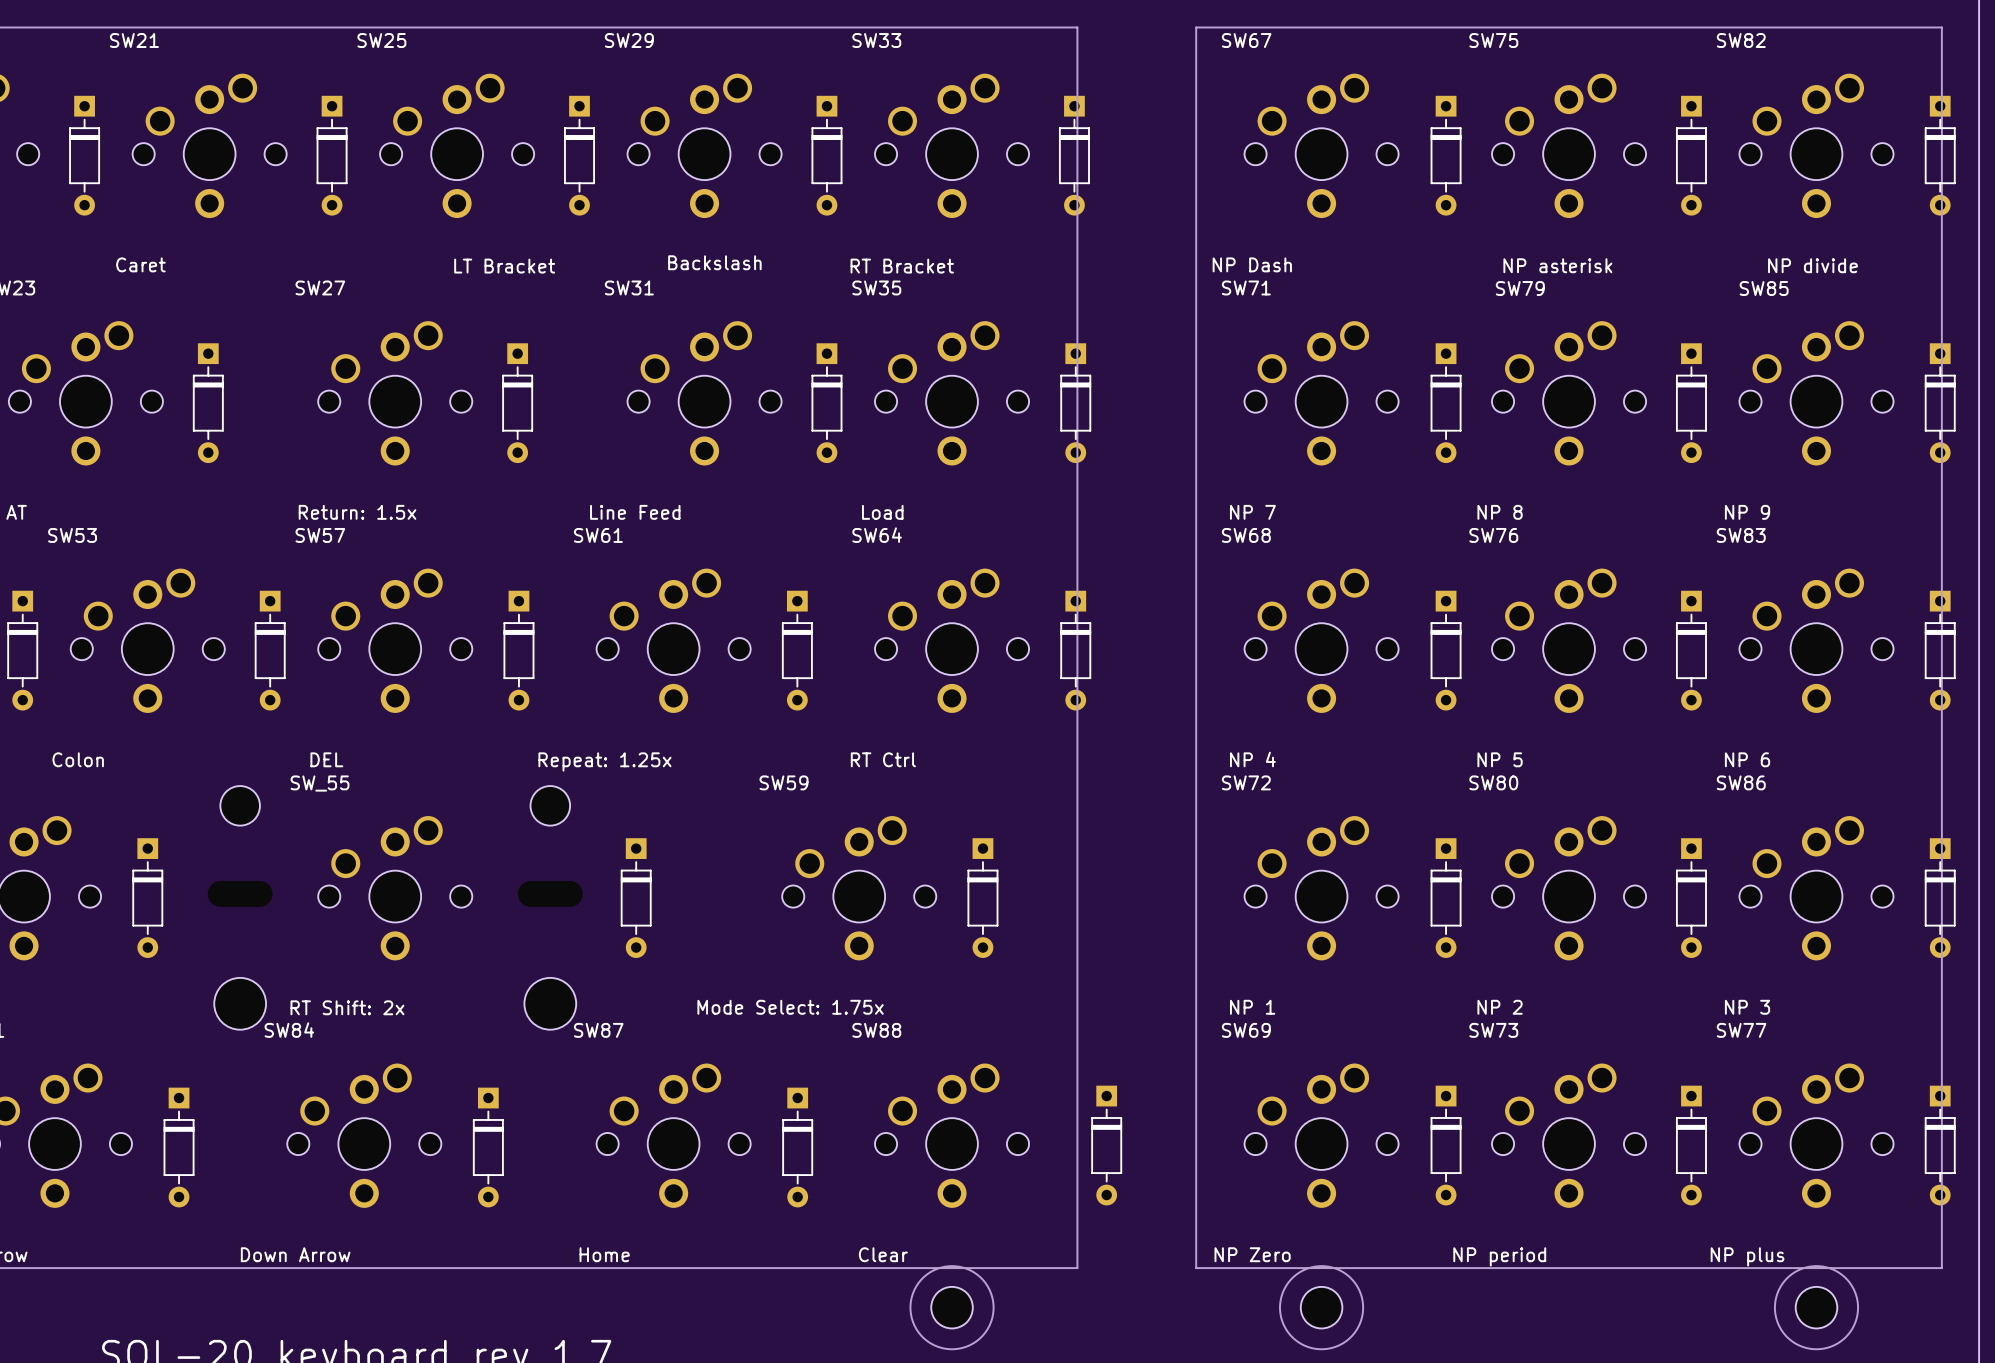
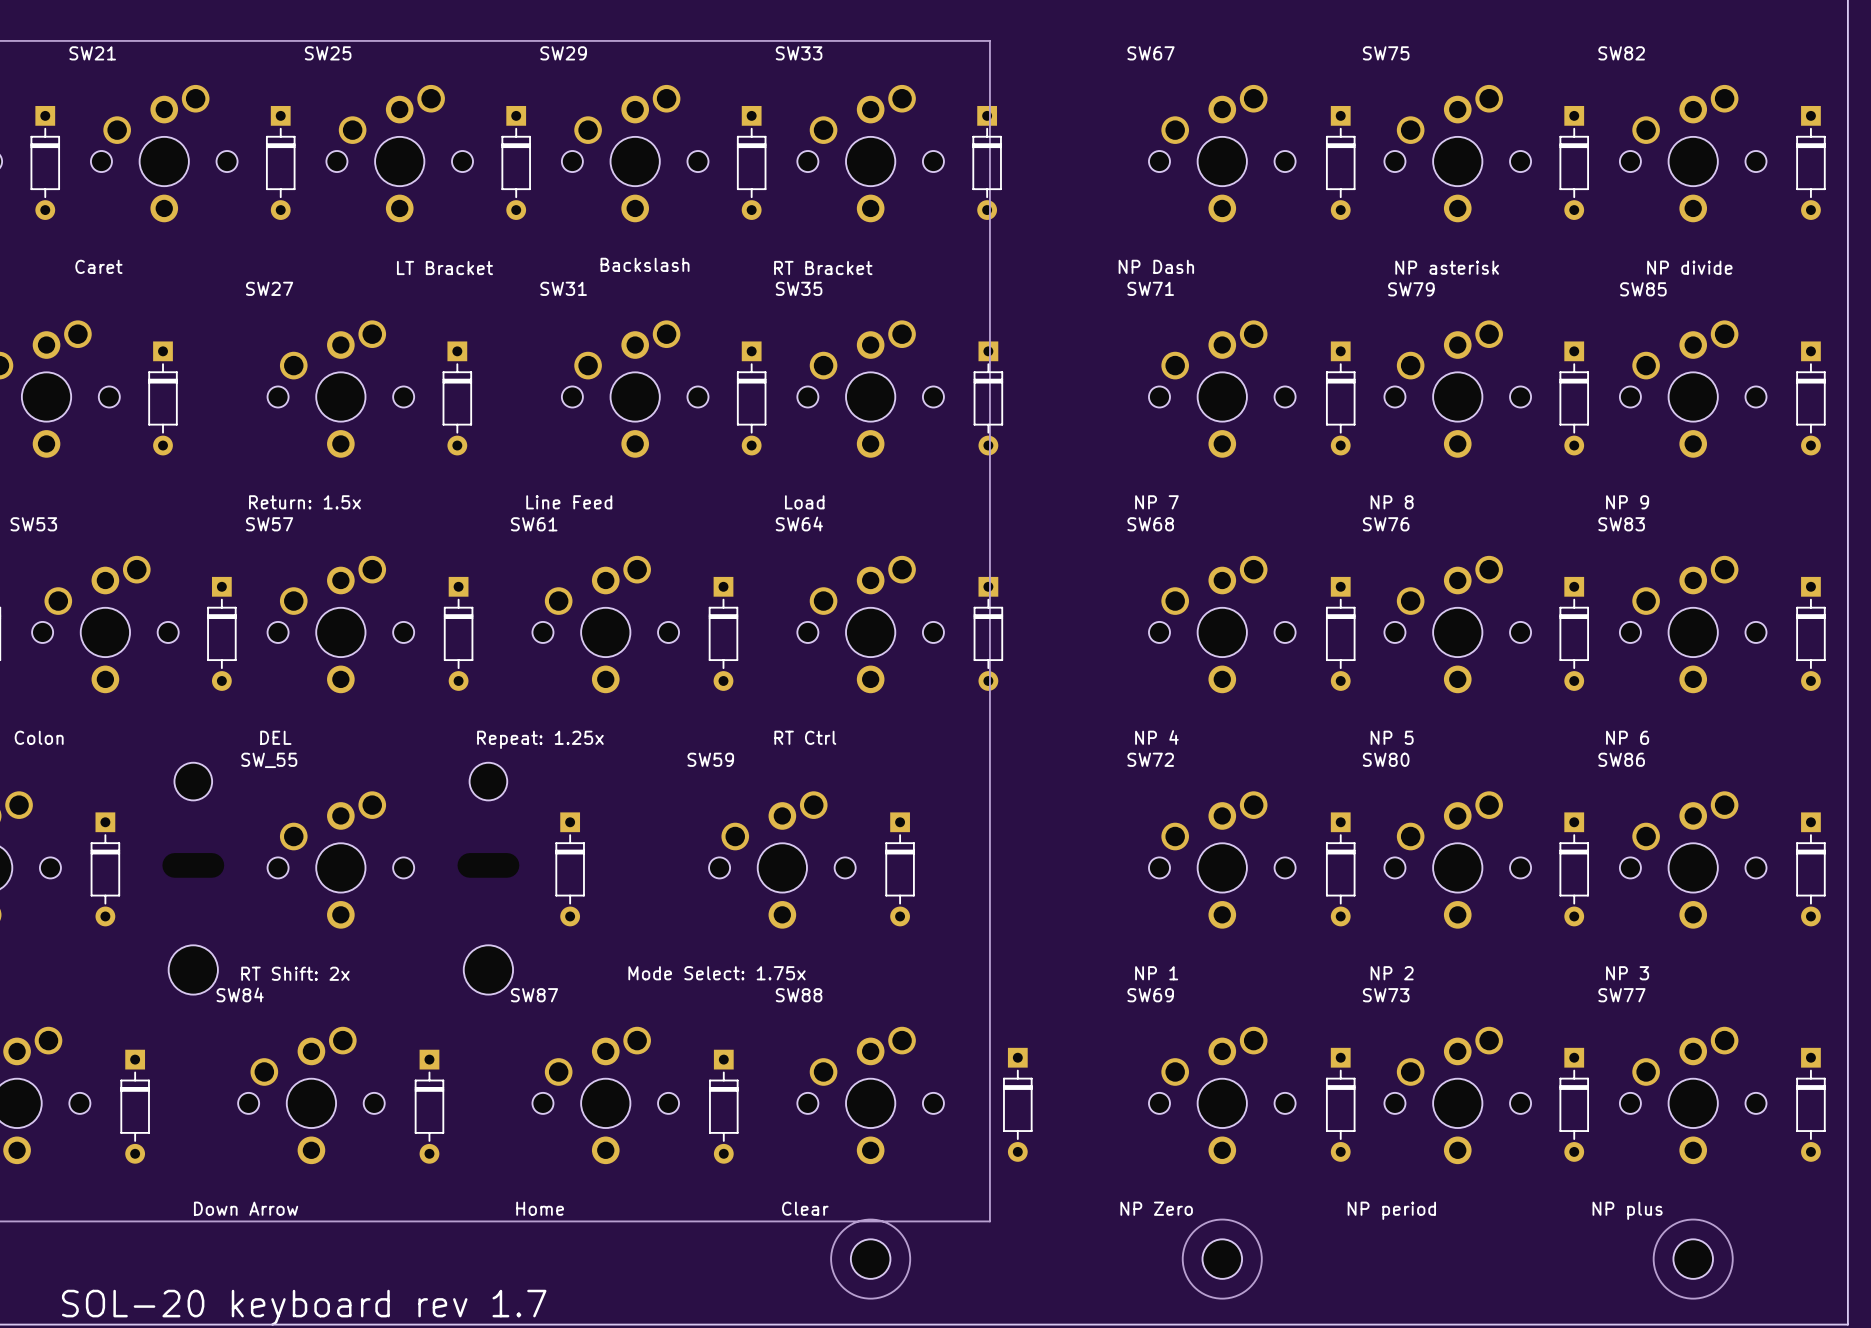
line: (1196, 27) (1196, 1268) (1941, 1268) (1941, 27) (1196, 27) -> none

